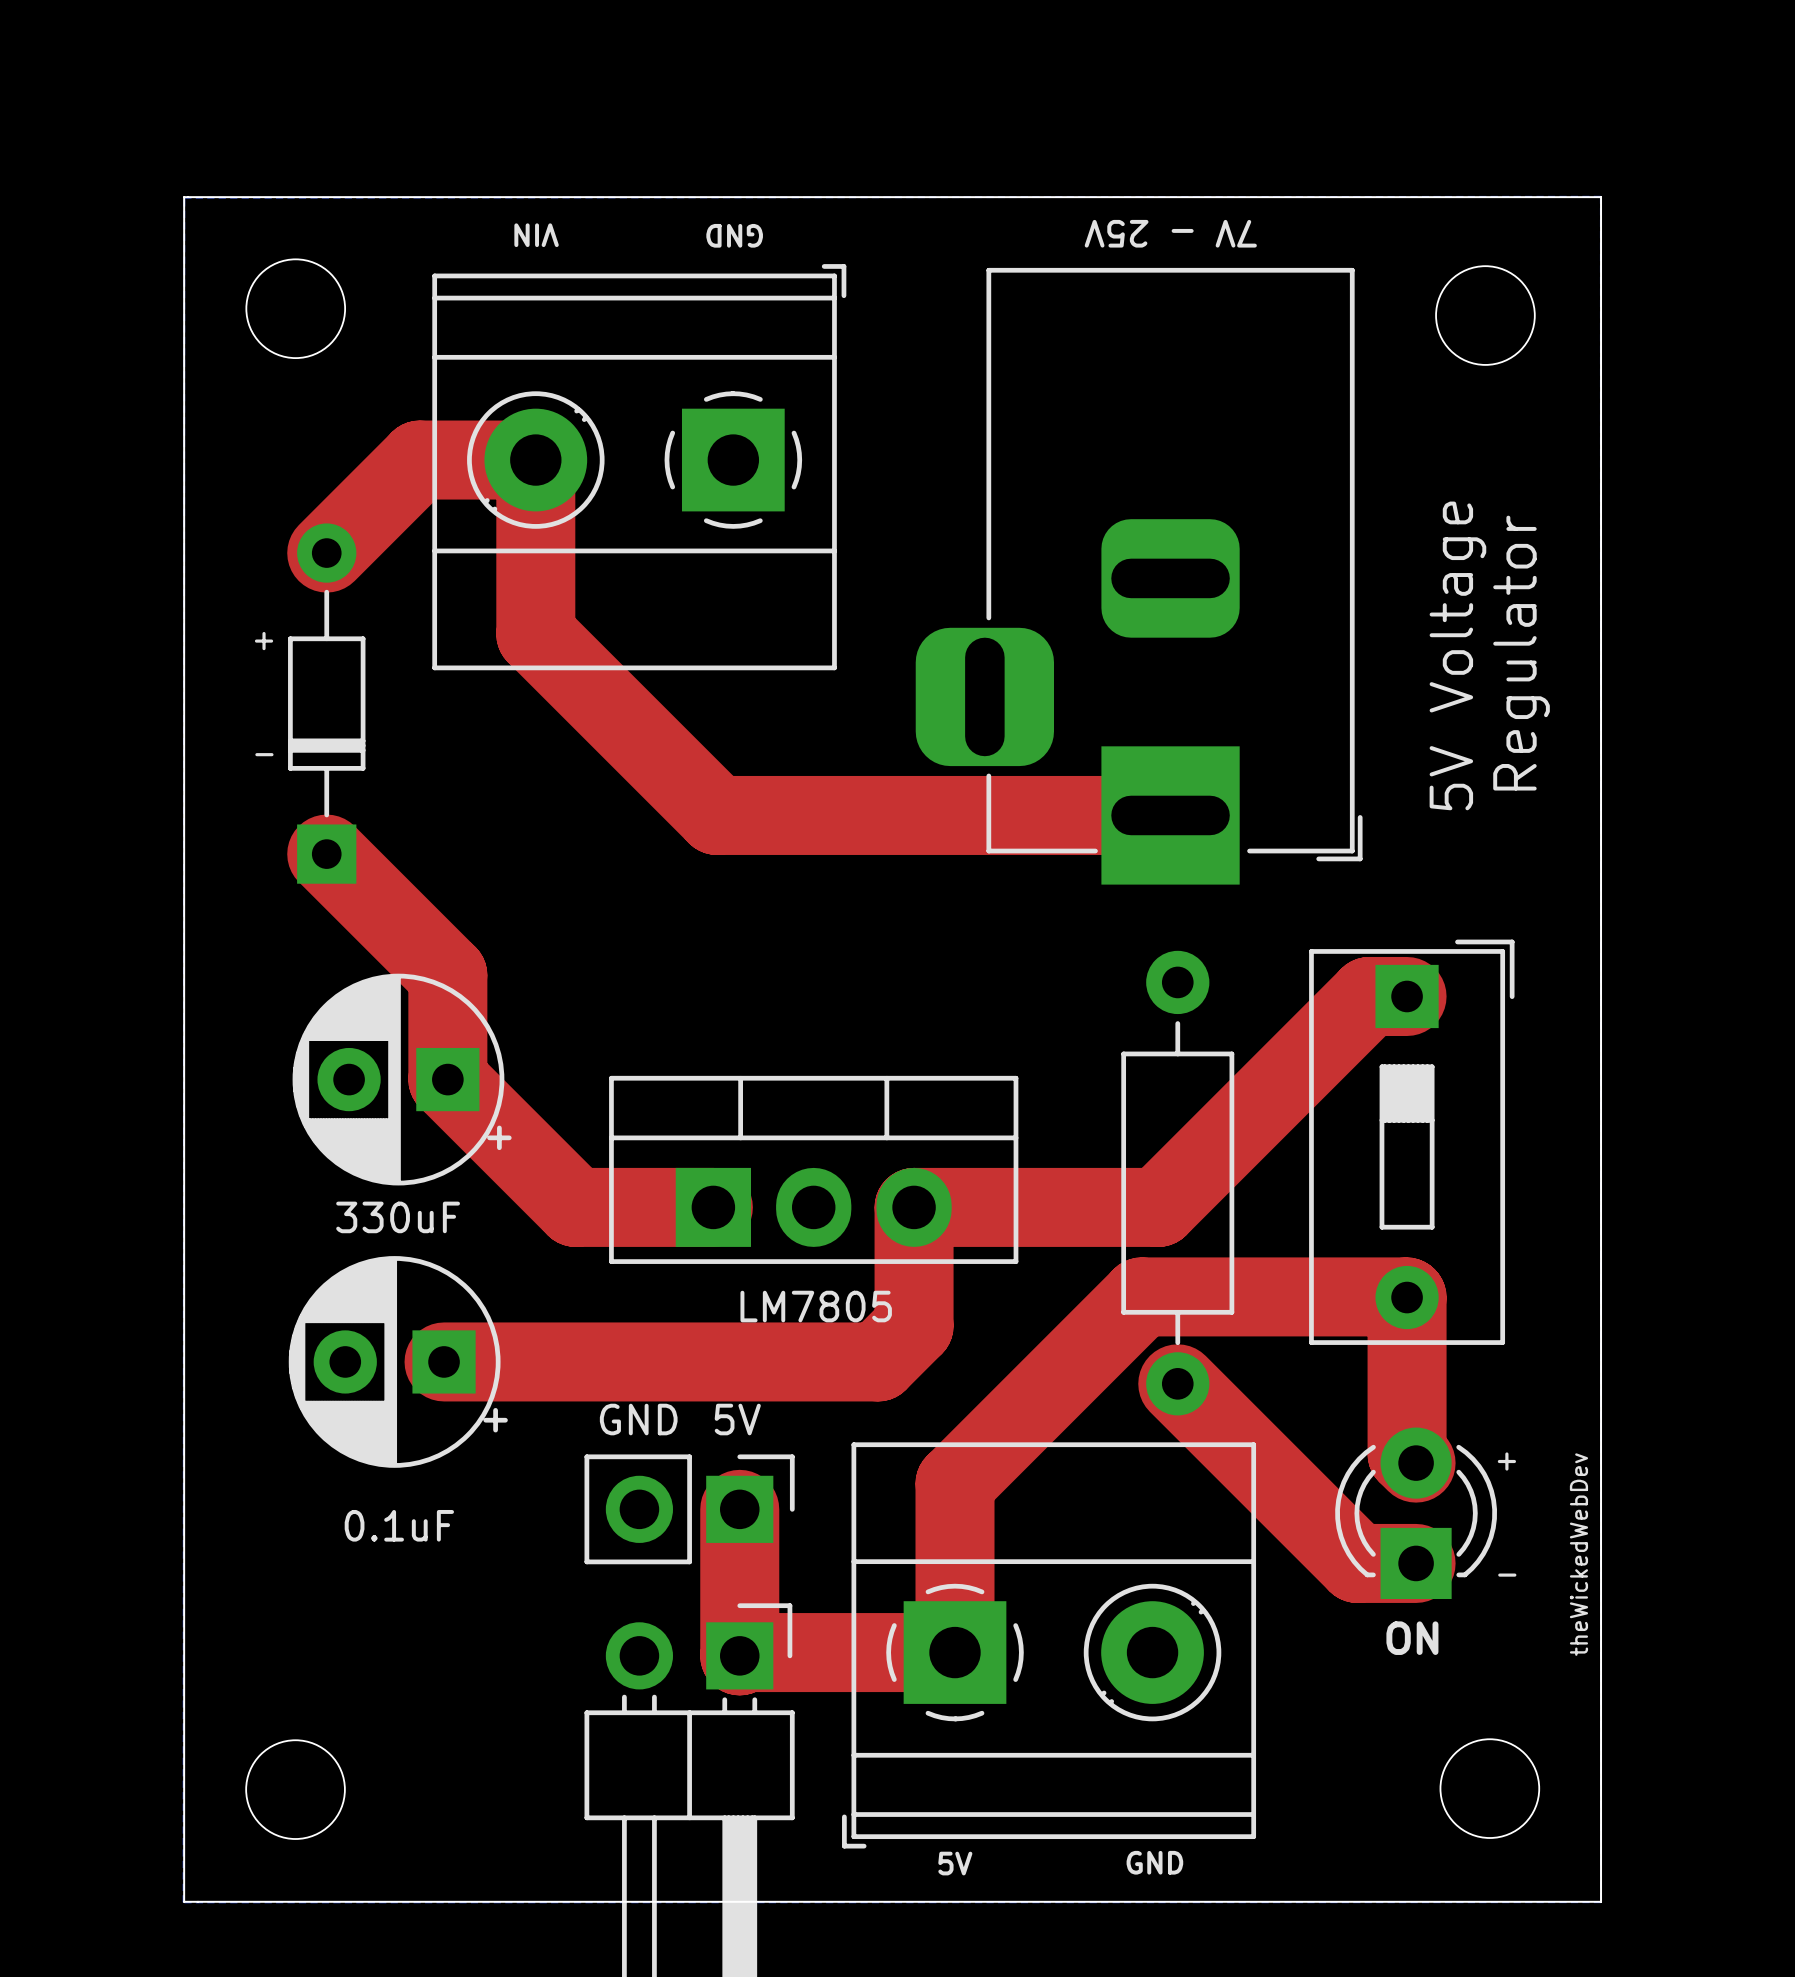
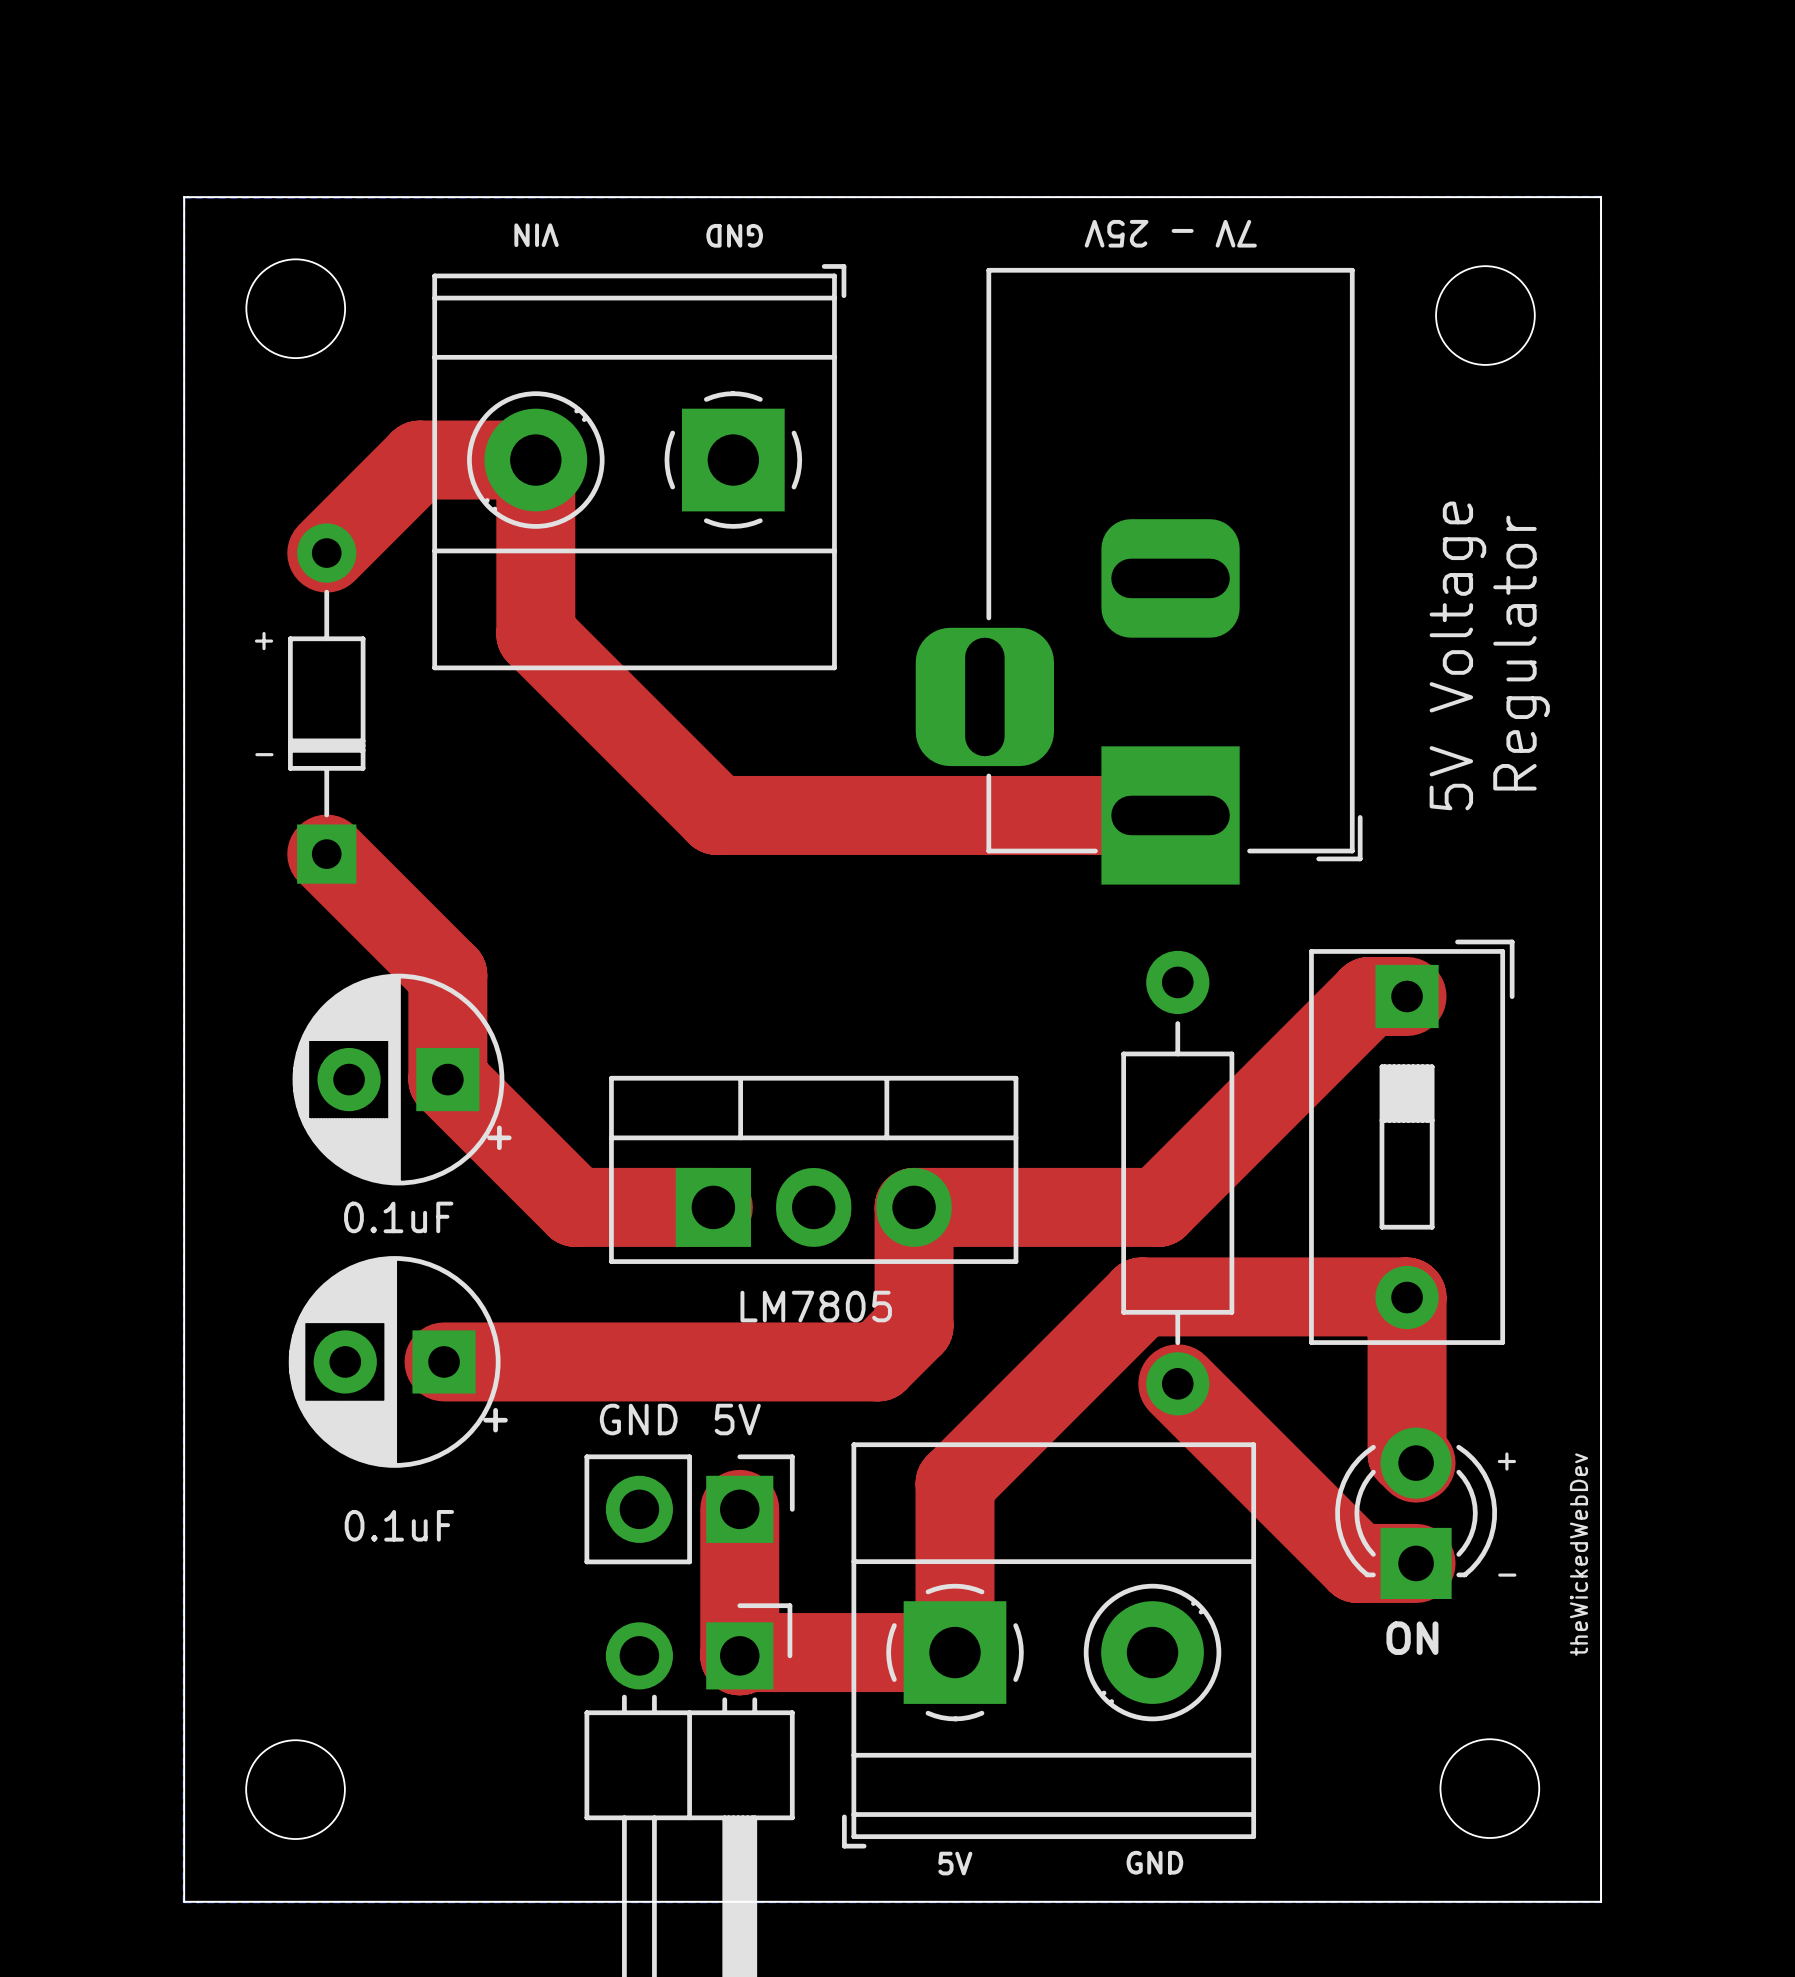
text: 330uF (398, 1217) -> 0.1uF (398, 1217)

